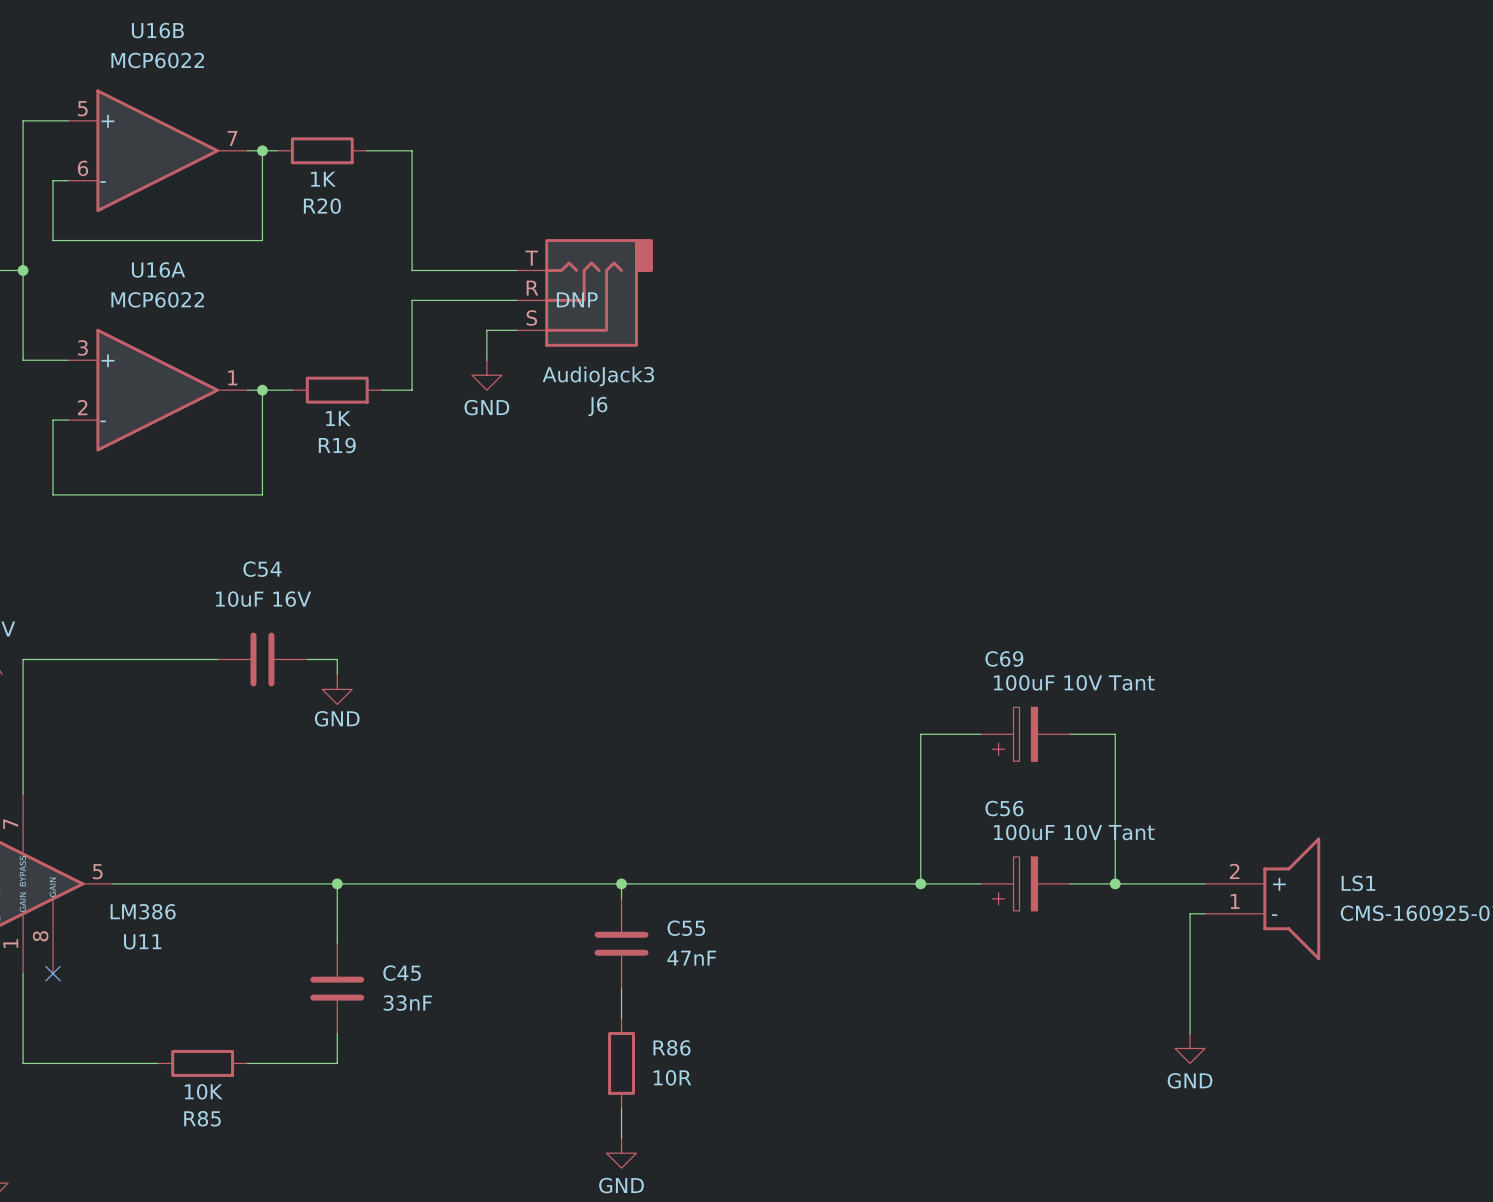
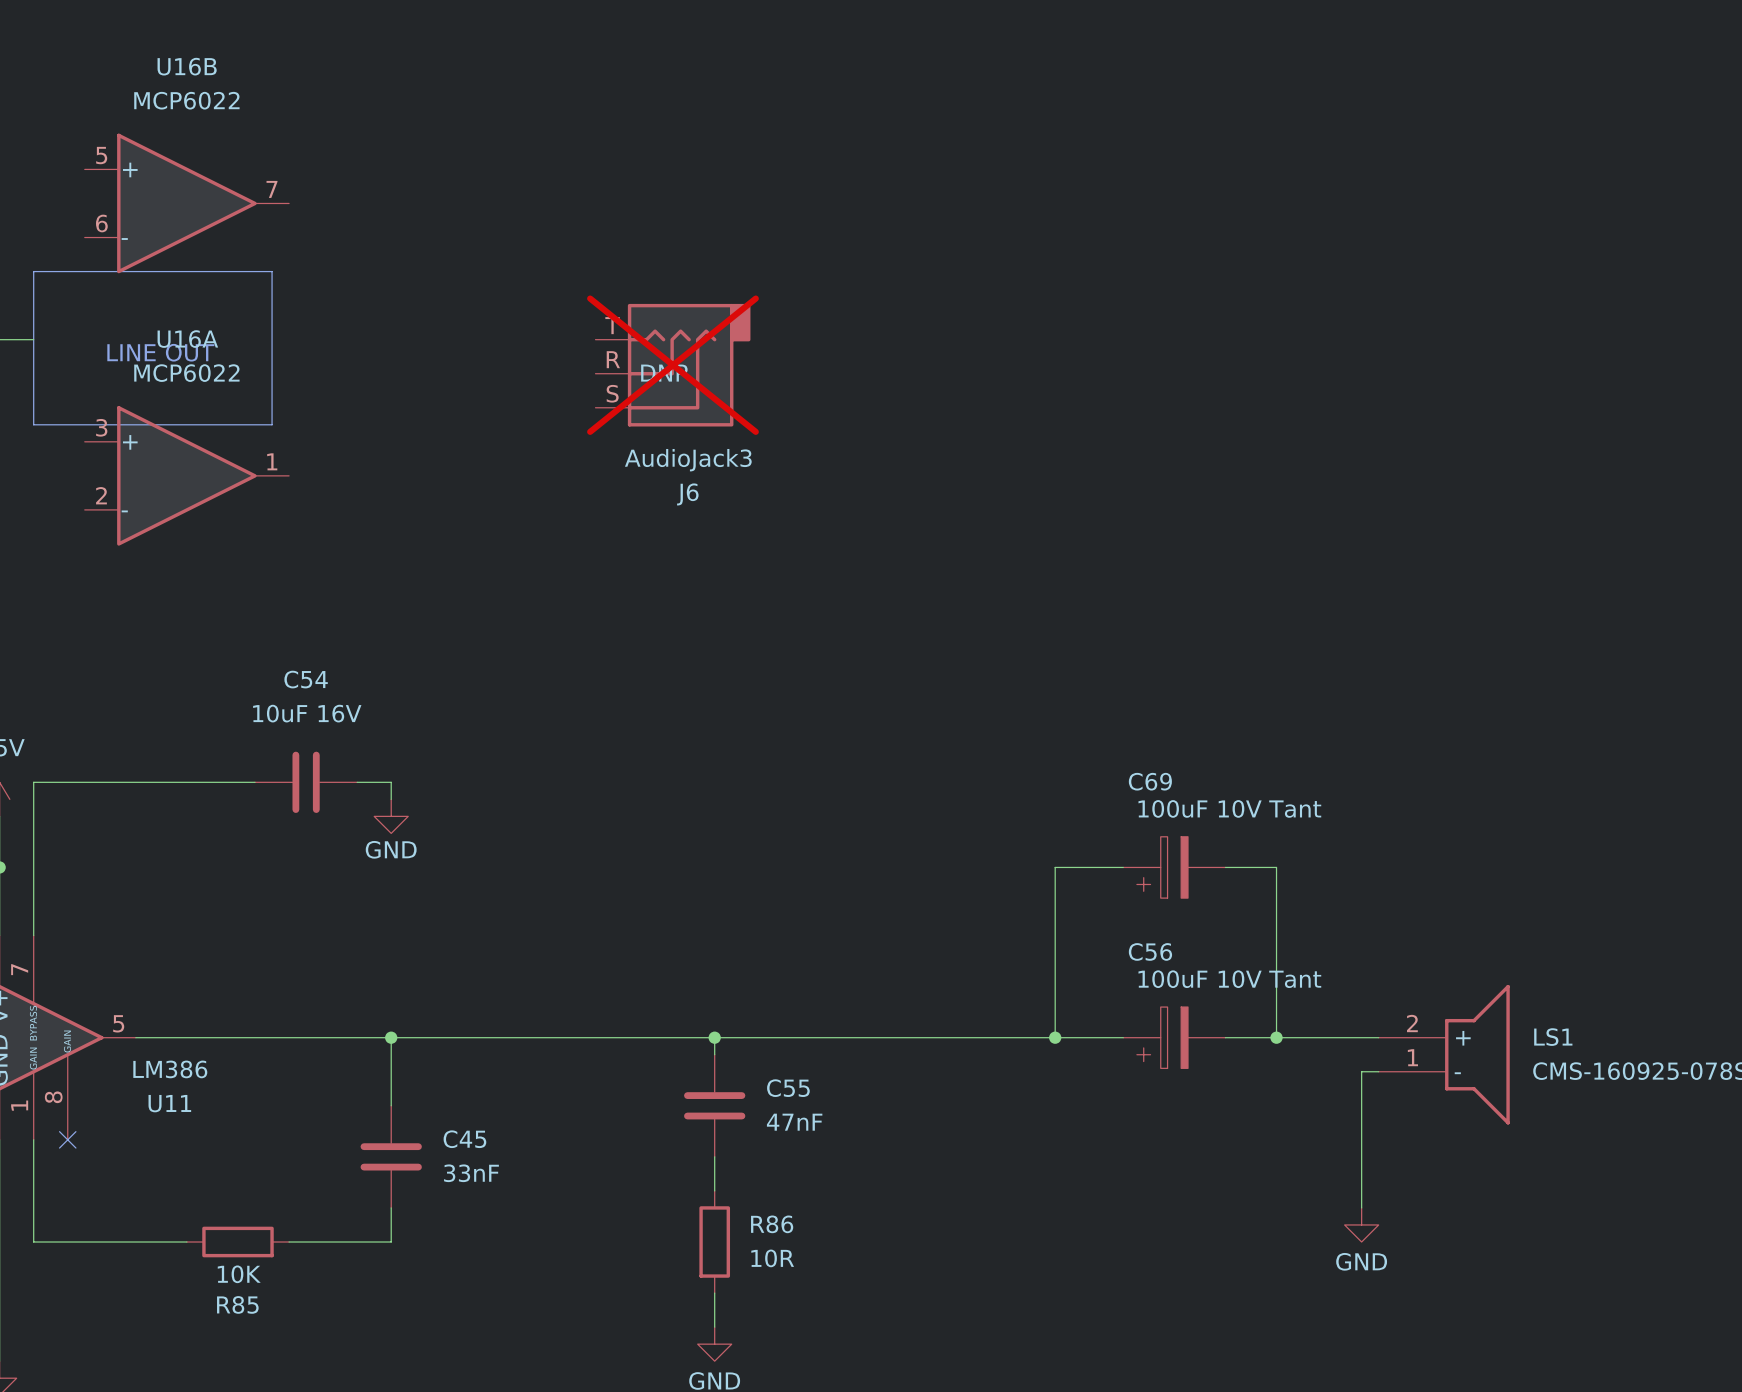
wire: (67, 120) (23, 120) (23, 360) (67, 360) -> none
wire: (247, 150) (277, 150) -> none
wire: (262, 150) (262, 240) (52, 240) (52, 180) (67, 180) -> none
junction: (262, 150) -> none
R20: 1K (322, 150) -> none
wire: (367, 150) (412, 150) (412, 270) (516, 270) -> none
line: none -> (33, 271) (272, 271) (272, 424) (33, 424) (33, 271)
junction: (23, 270) -> none
text: none -> LINE OUT (160, 352)
J6 do-not-place cross: none -> (672, 365)
wire: (516, 300) (412, 300) (412, 390) (382, 390) -> none
wire: (516, 330) (486, 330) (486, 360) -> none
power symbol: GND (486, 375) -> none
wire: (247, 390) (292, 390) -> none
wire: (262, 390) (262, 494) (52, 494) (52, 420) (67, 420) -> none
junction: (262, 390) -> none
R19: 1K (337, 390) -> none

